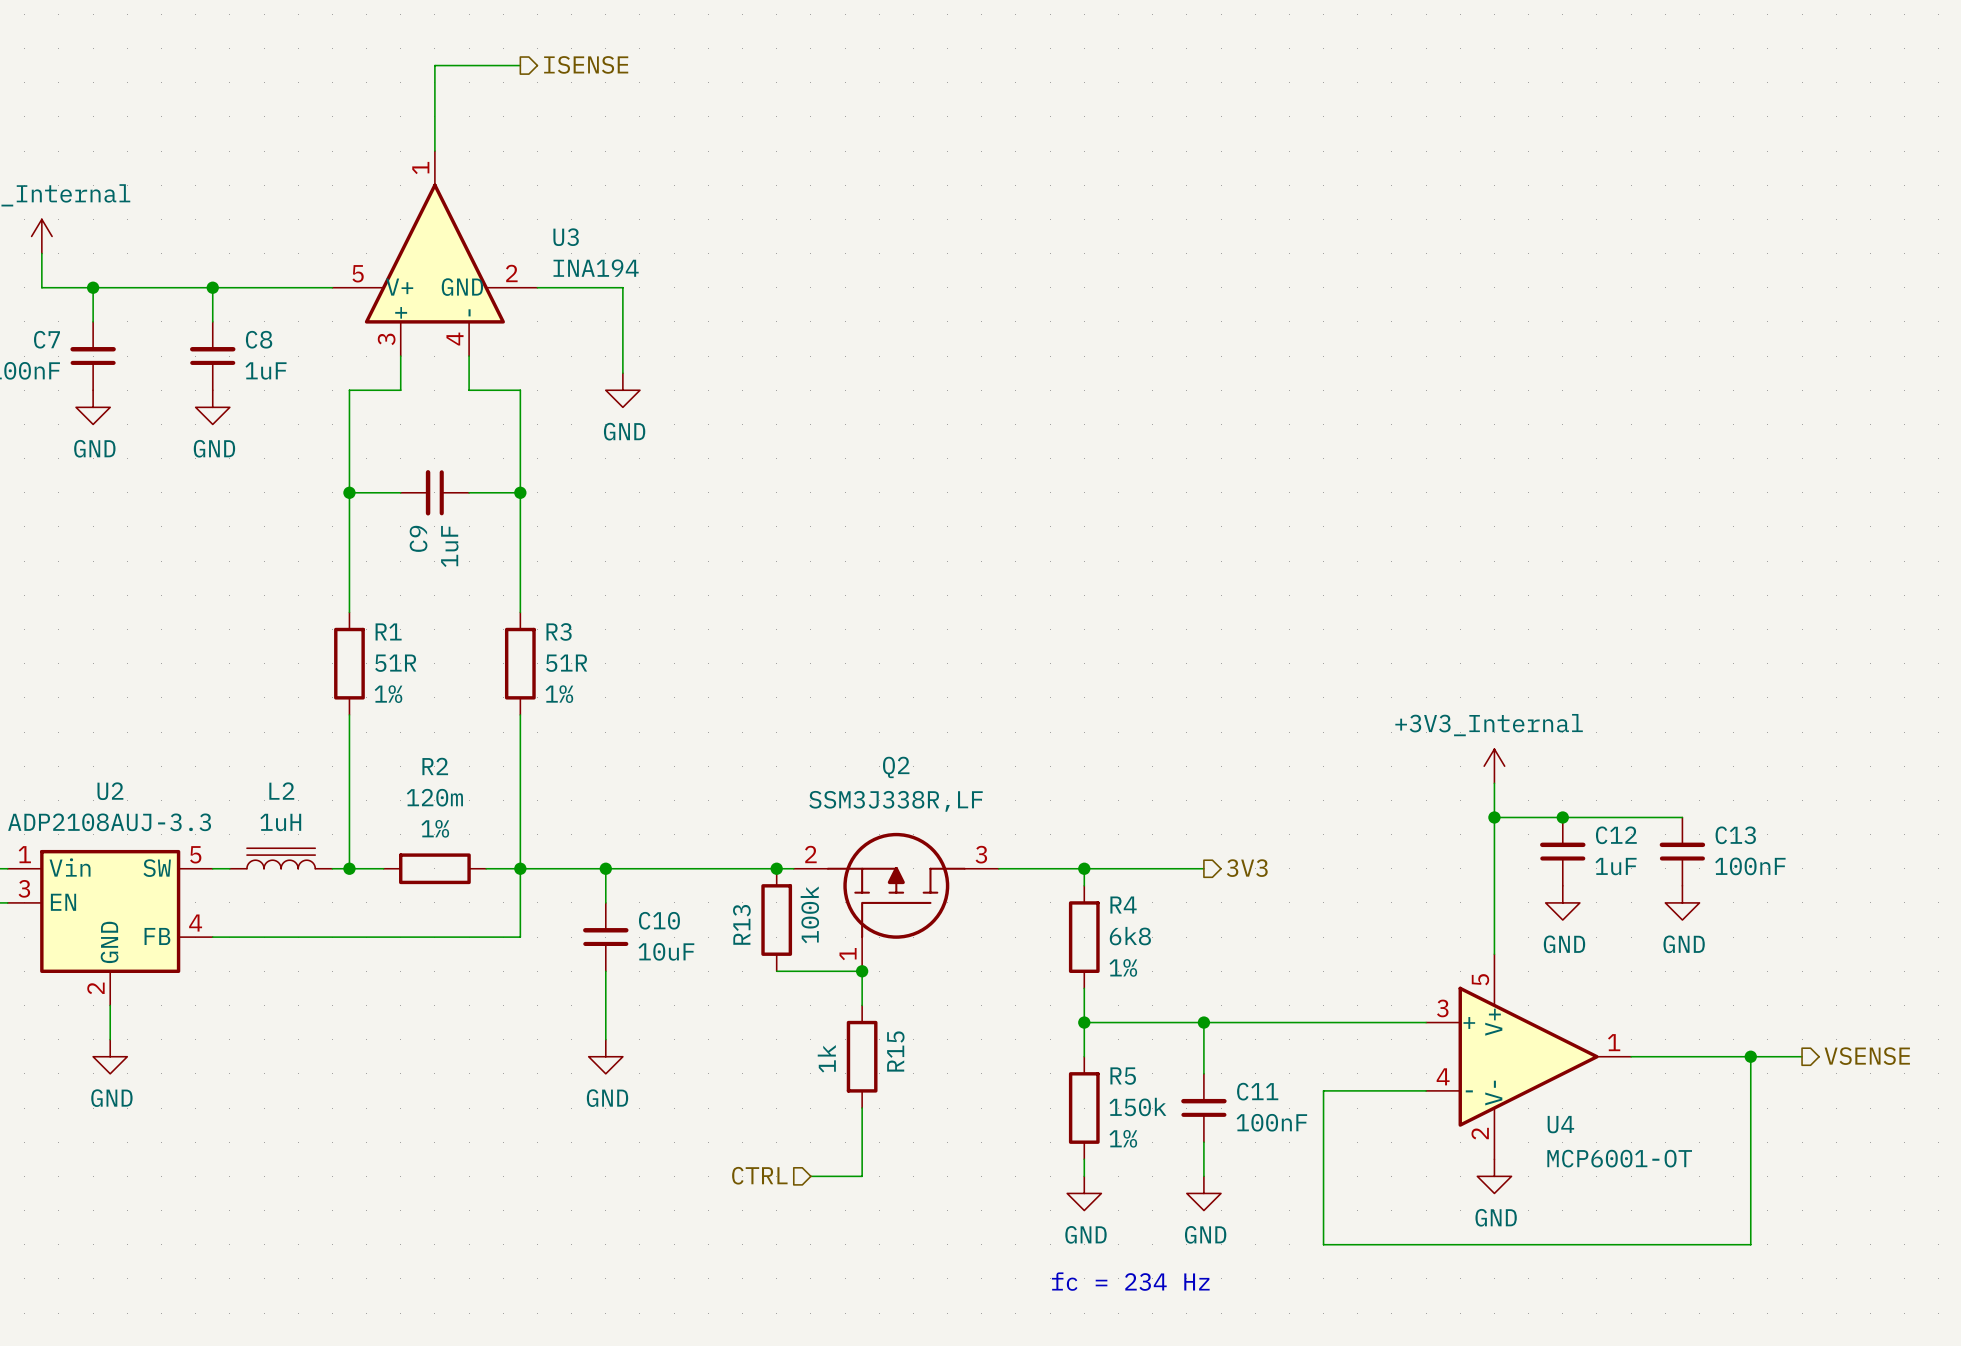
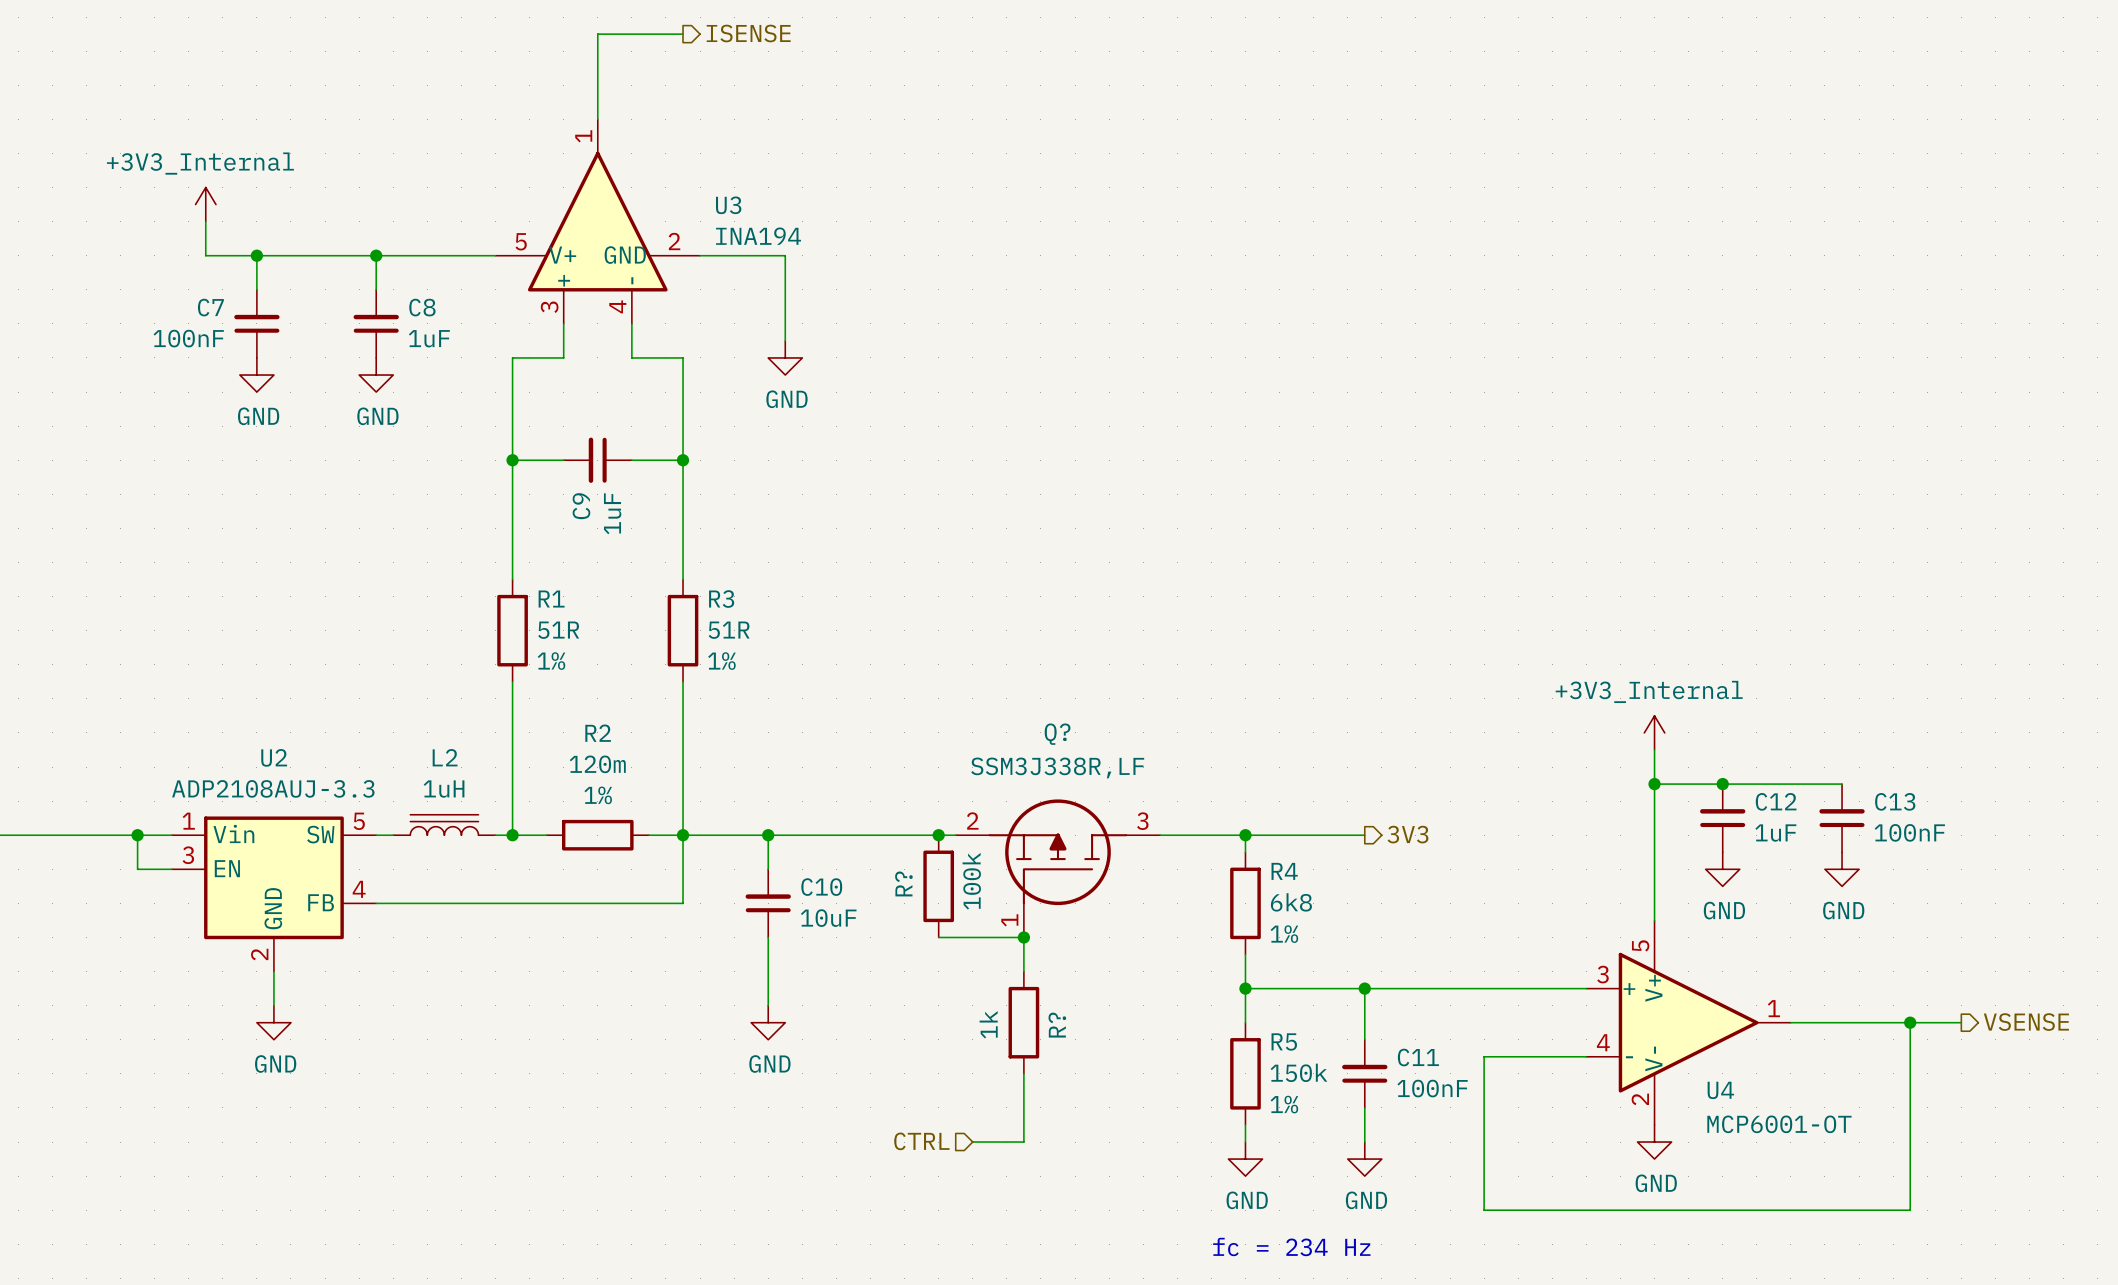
Q2 name: Q2 (896, 767) -> Q? (1057, 734)
R13 name: R13 (741, 924) -> R? (903, 883)
R15 name: R15 (895, 1051) -> R? (1057, 1025)

